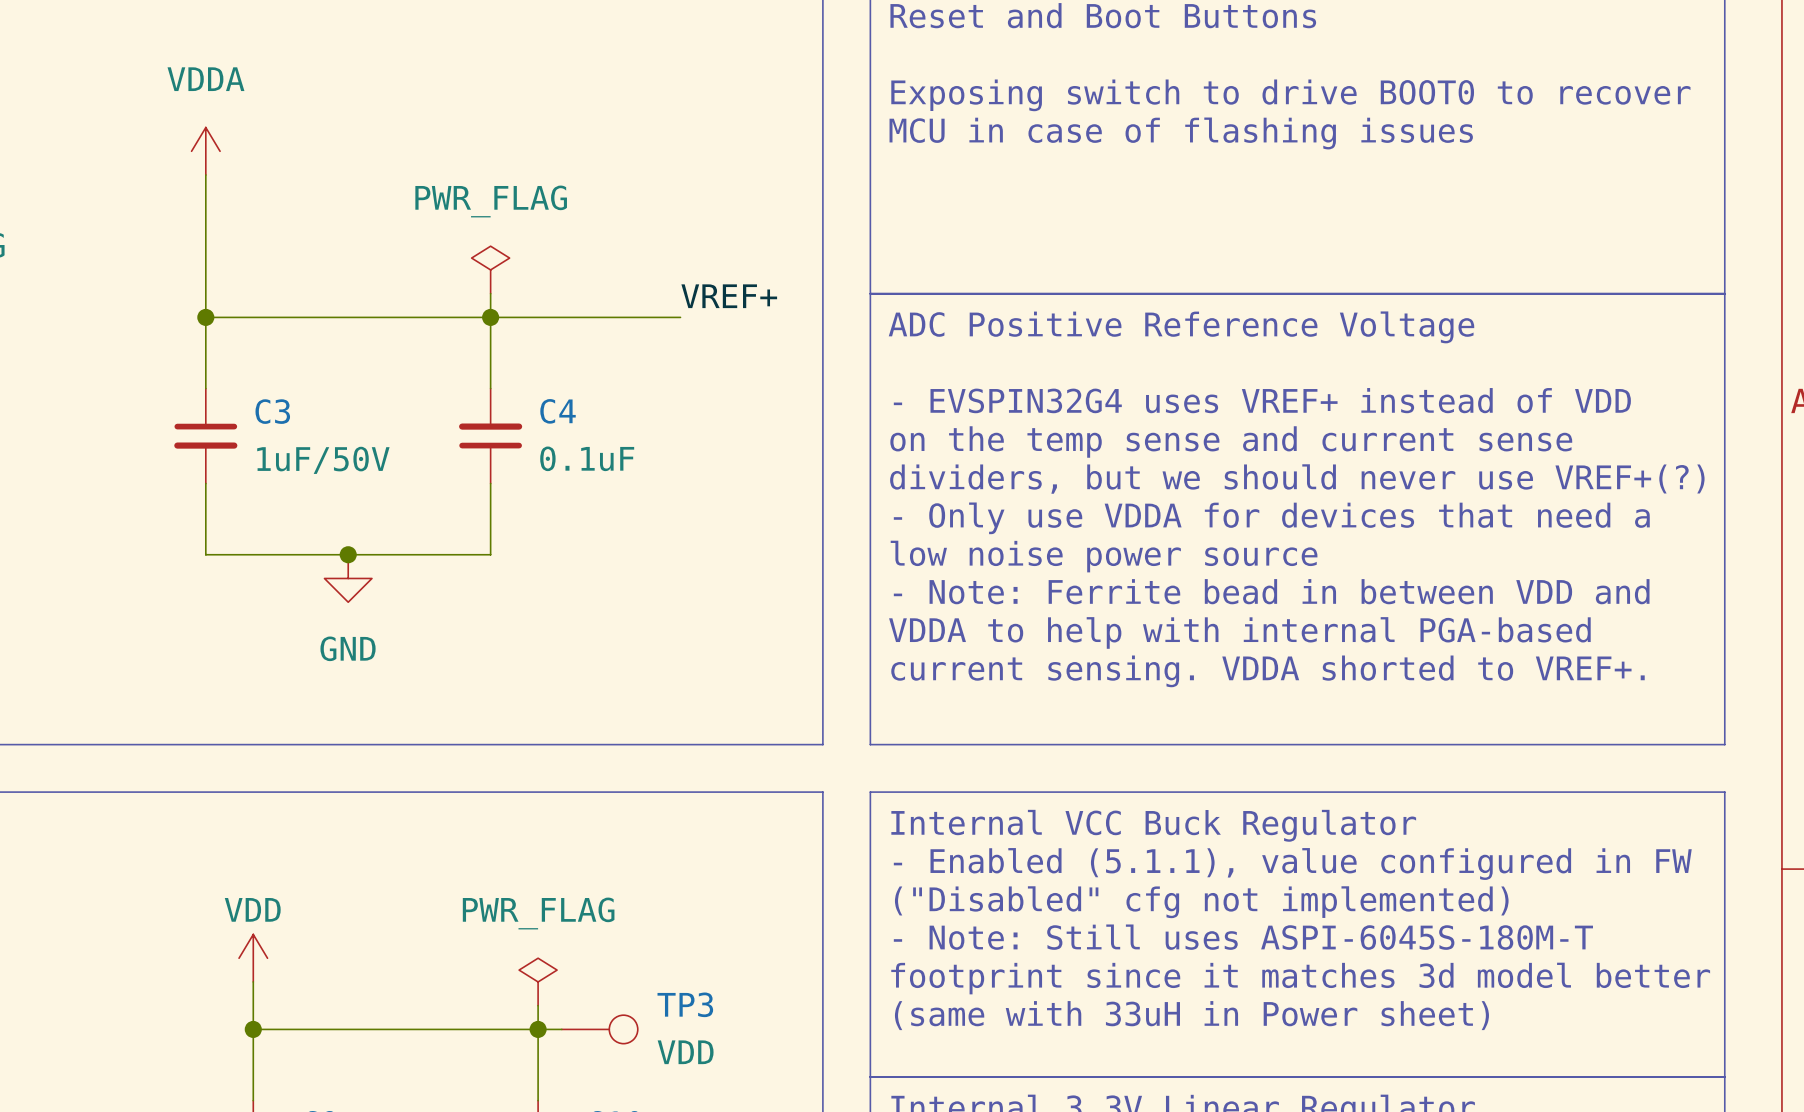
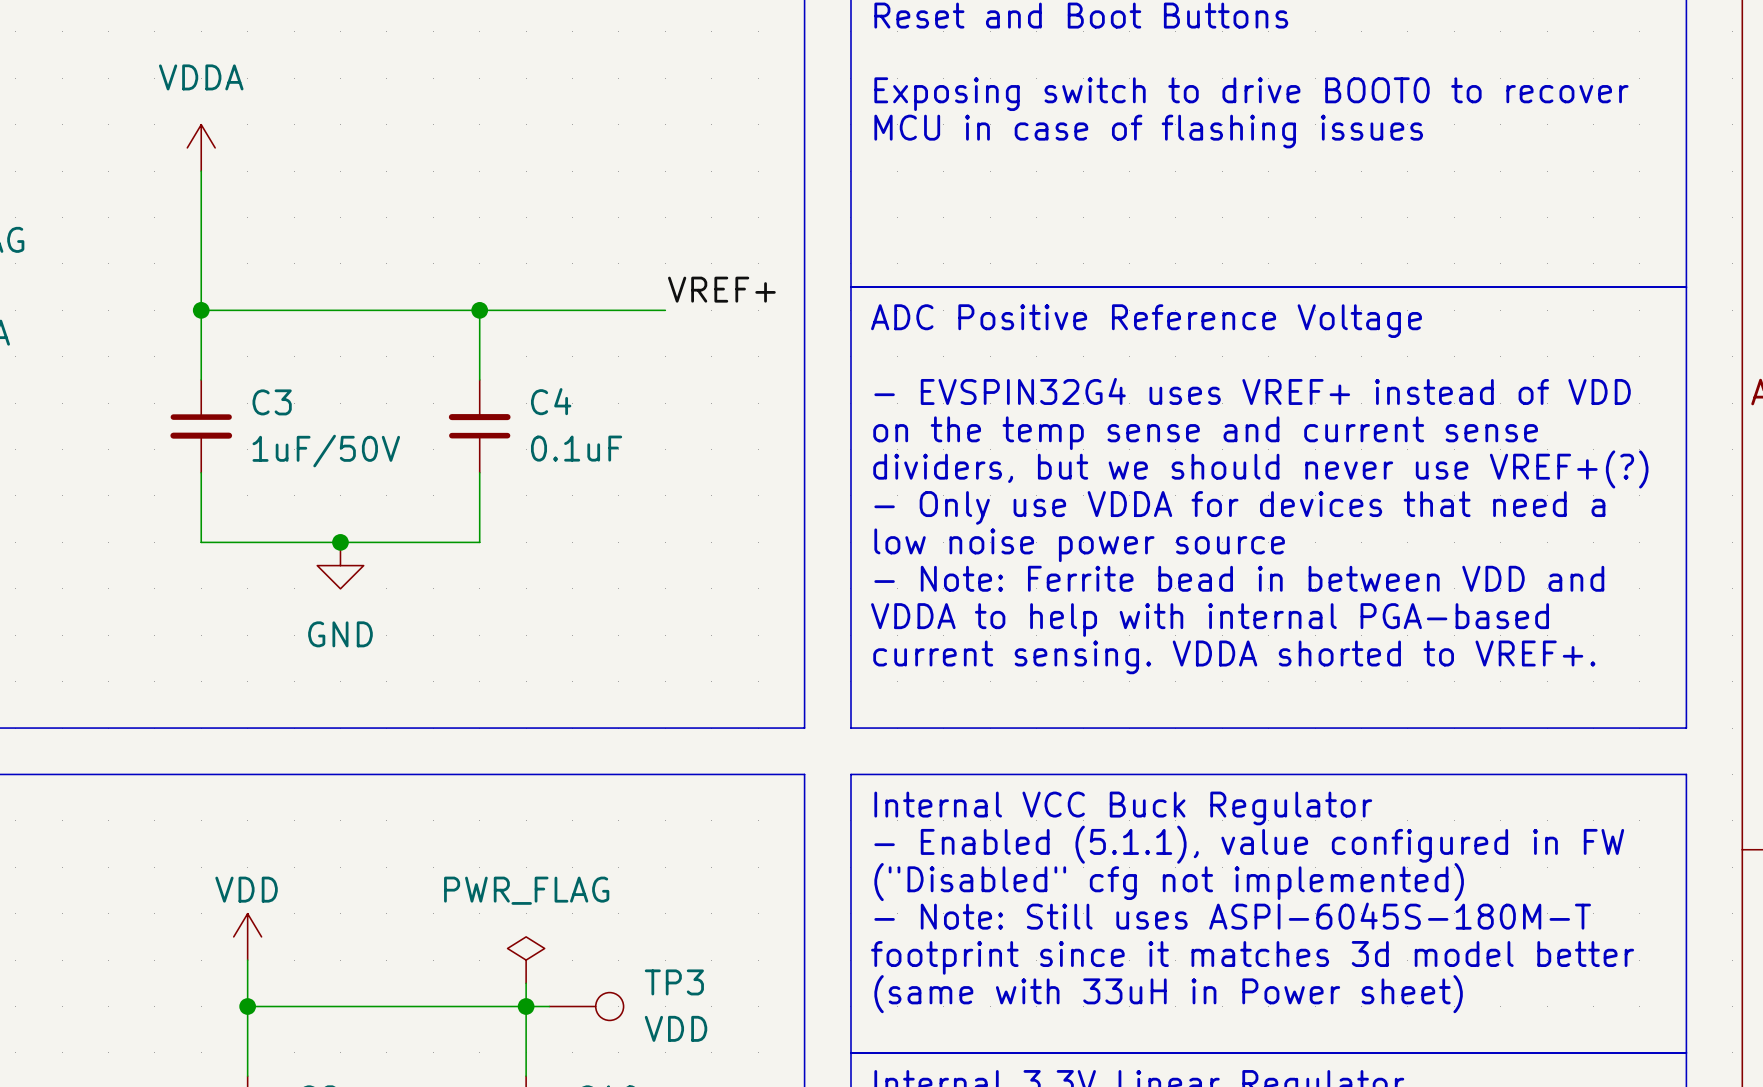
power symbol: PWR_FLAG (490, 269) -> none
wire: (490, 293) (490, 317) -> none

